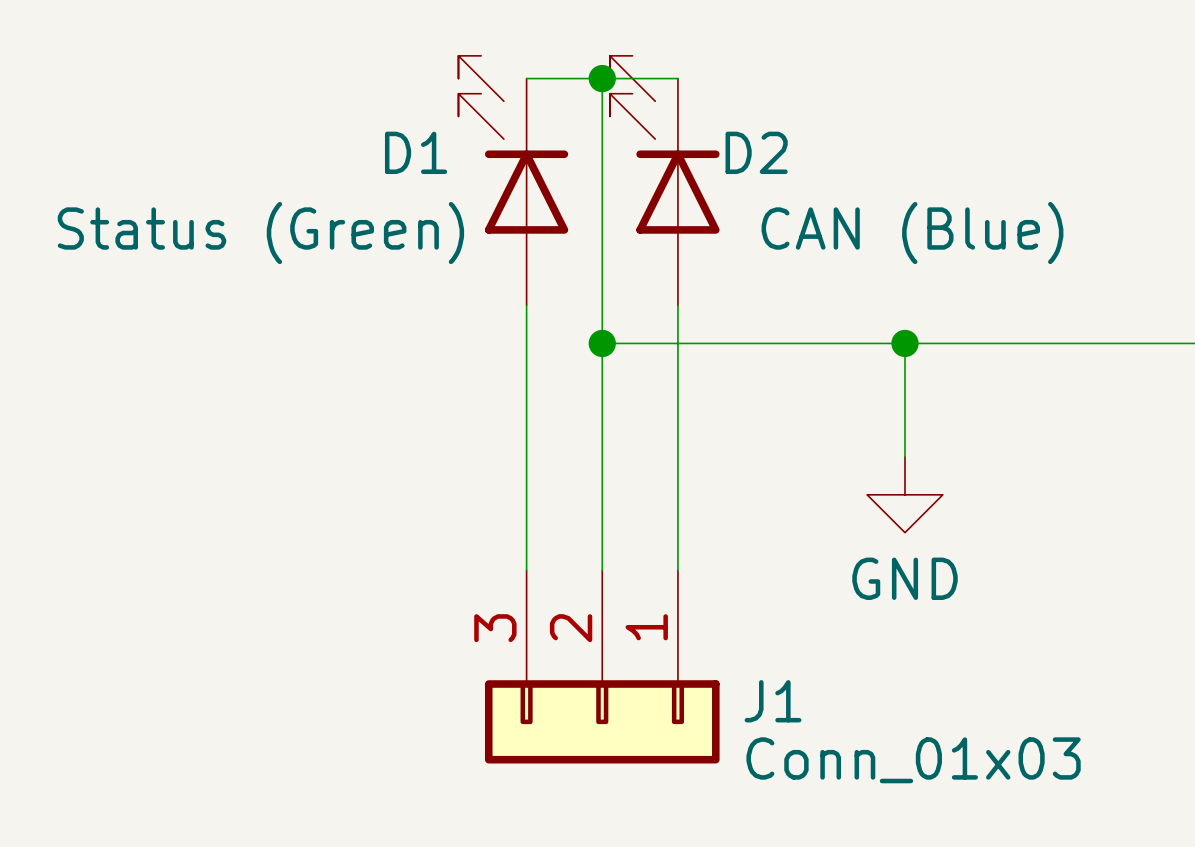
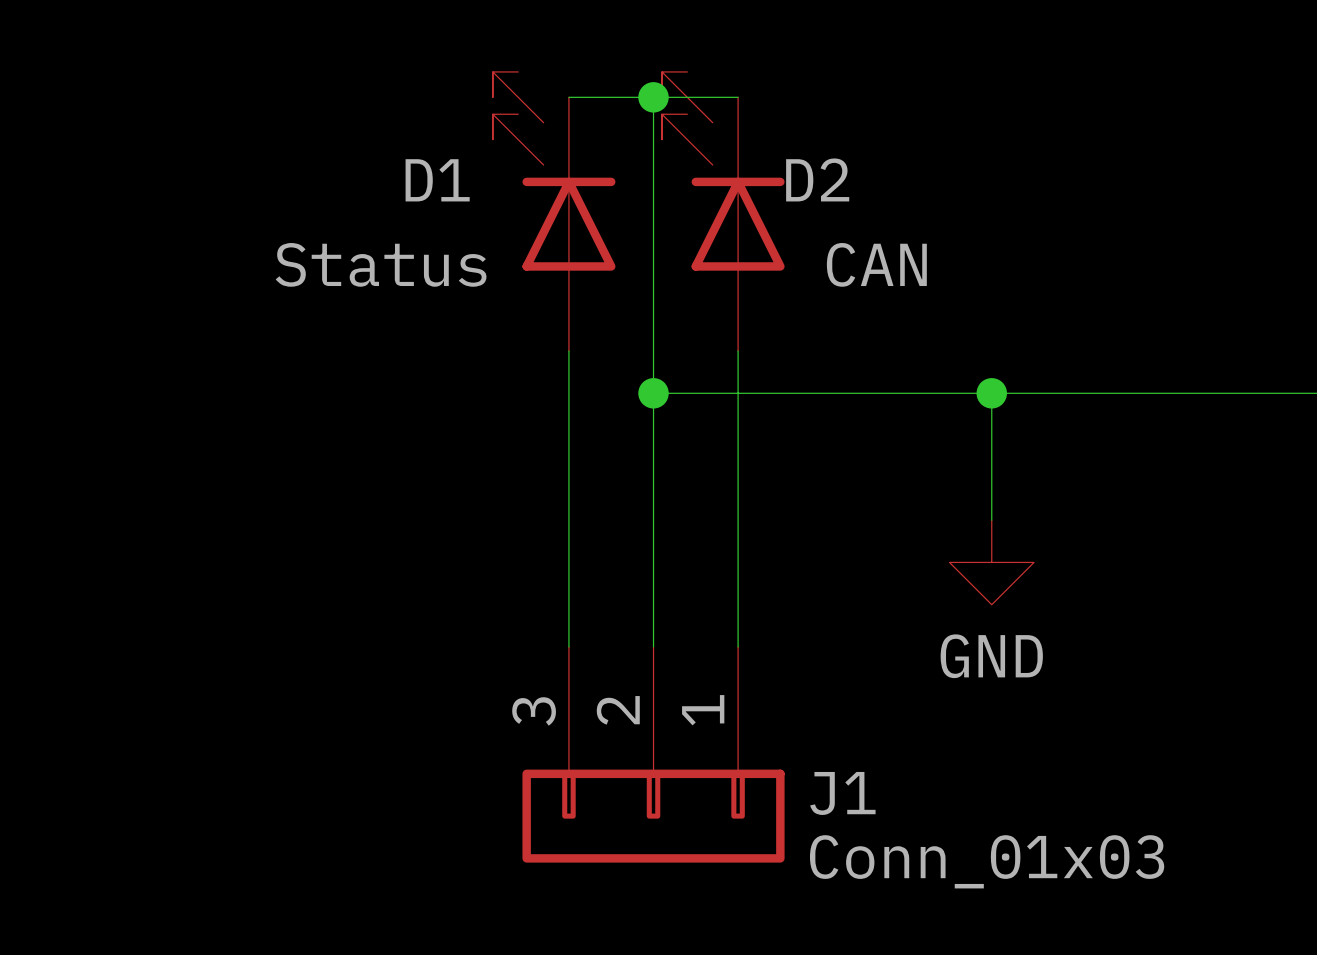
D1 value: Status (Green) (260, 233) -> Status (381, 264)
D2 value: CAN (Blue) (912, 233) -> CAN (876, 264)

